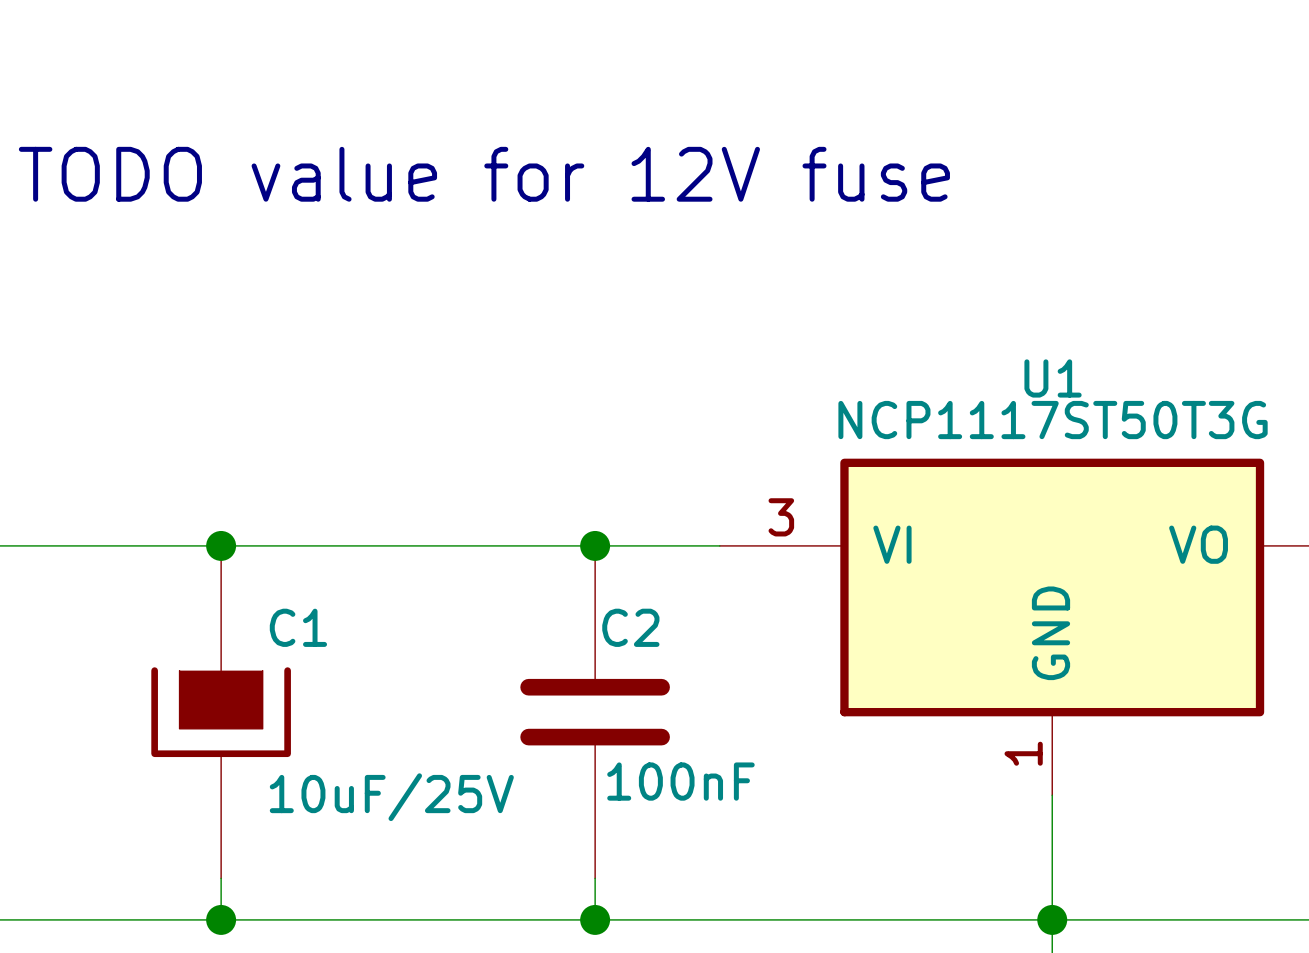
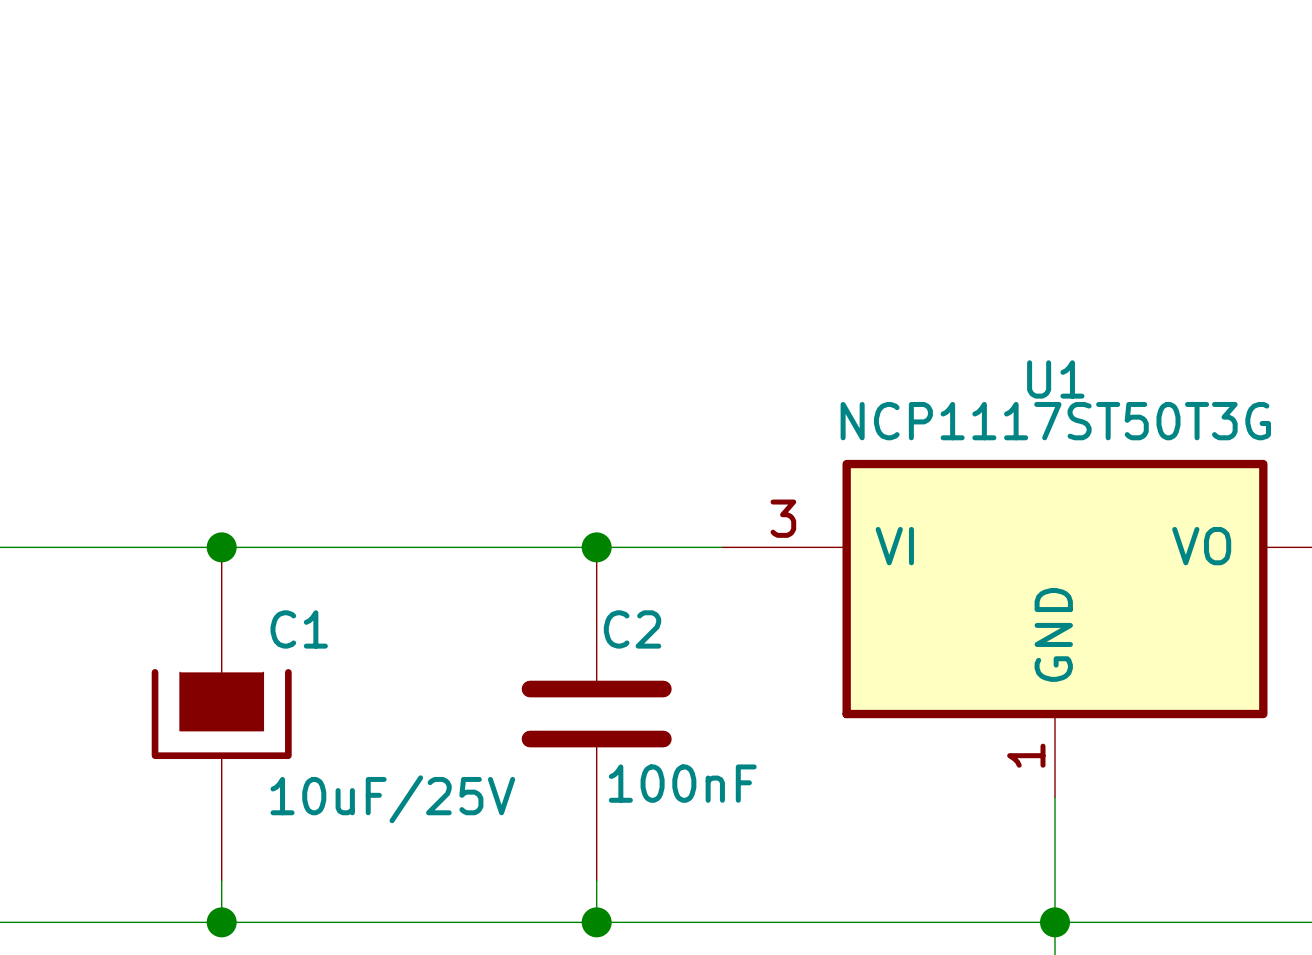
text: TODO value for 12V fuse (484, 174) -> none

